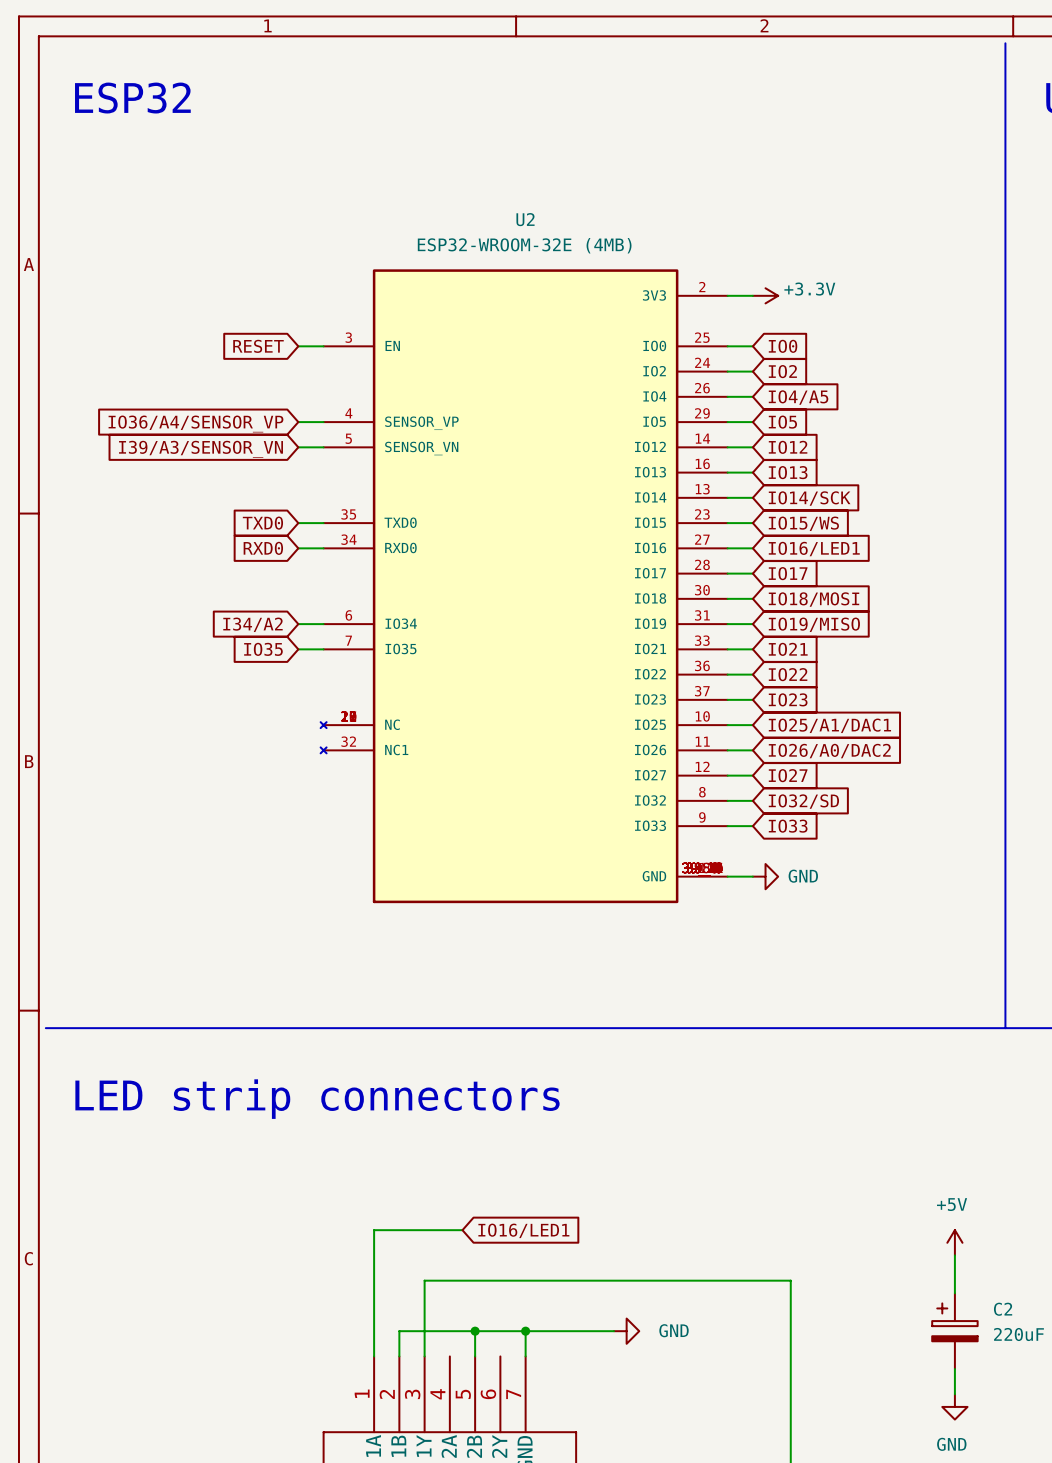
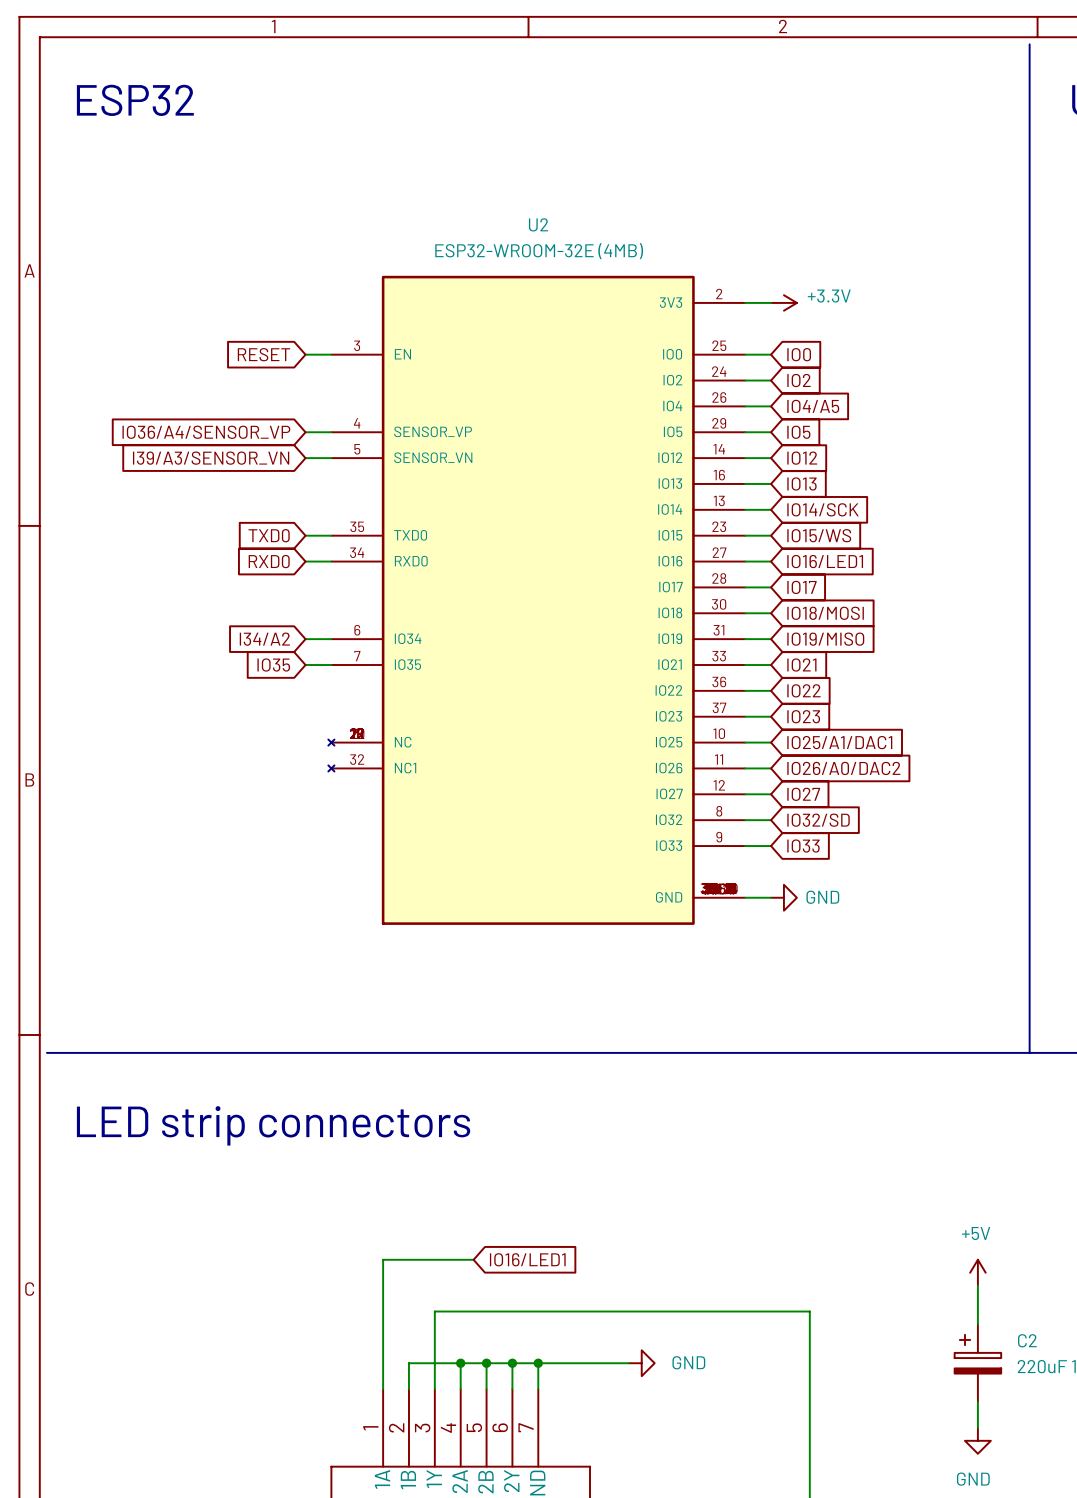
wire: none -> (460, 1363) (460, 1389)
junction: none -> (460, 1363)
wire: none -> (512, 1363) (512, 1389)
junction: none -> (512, 1363)

